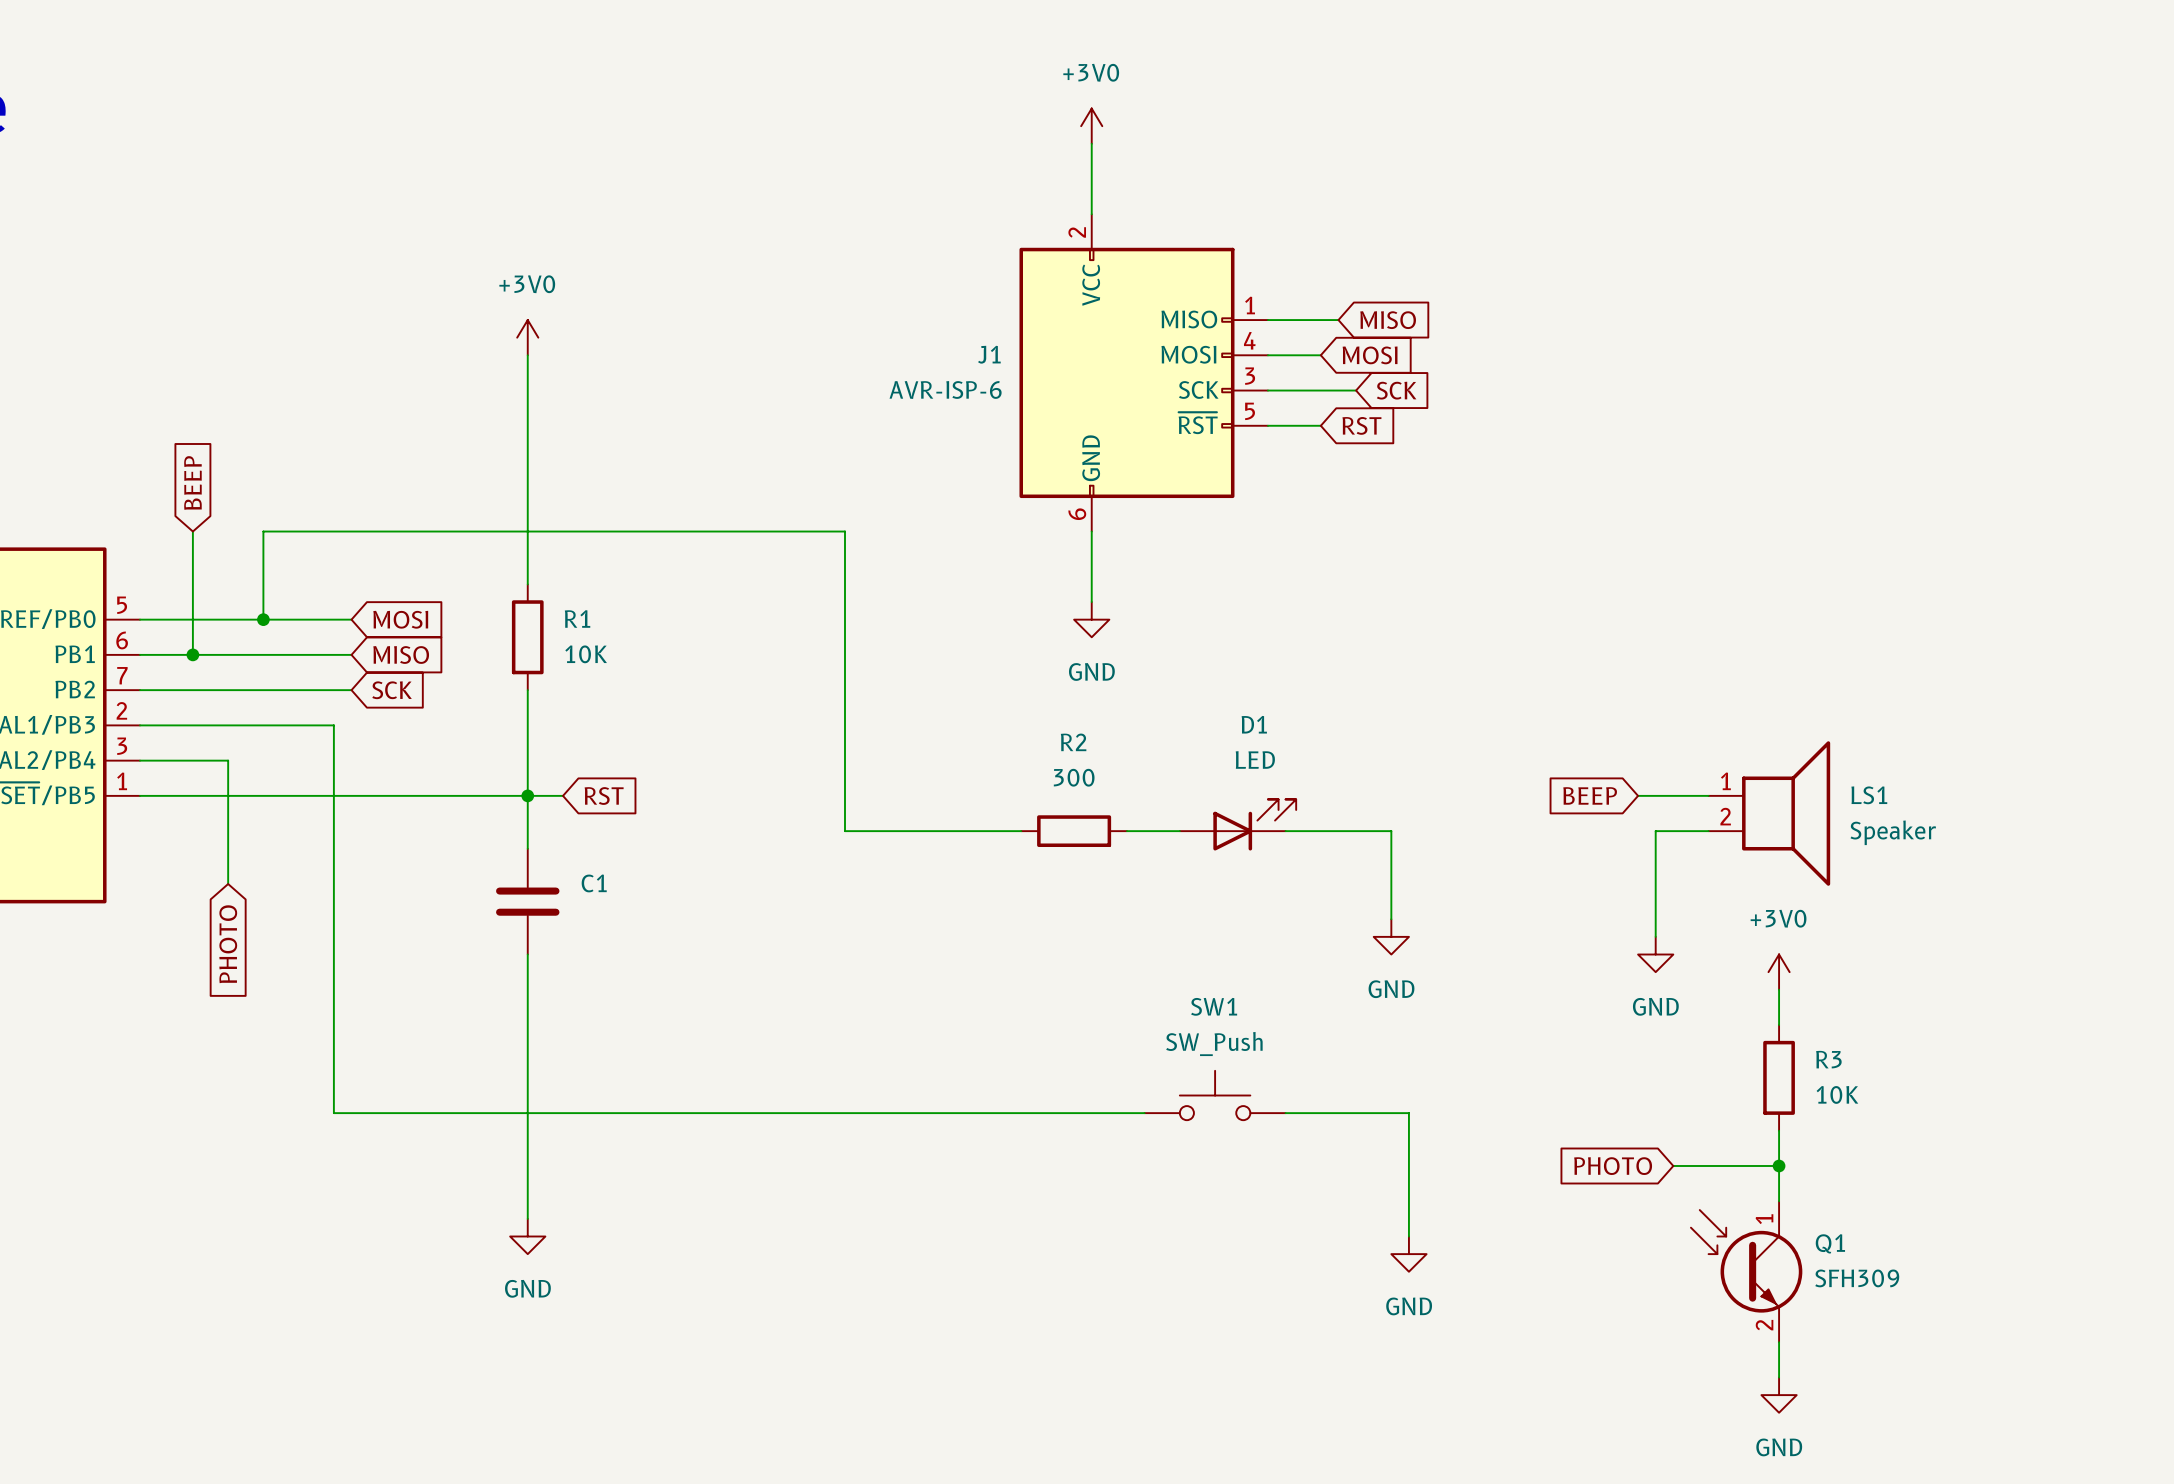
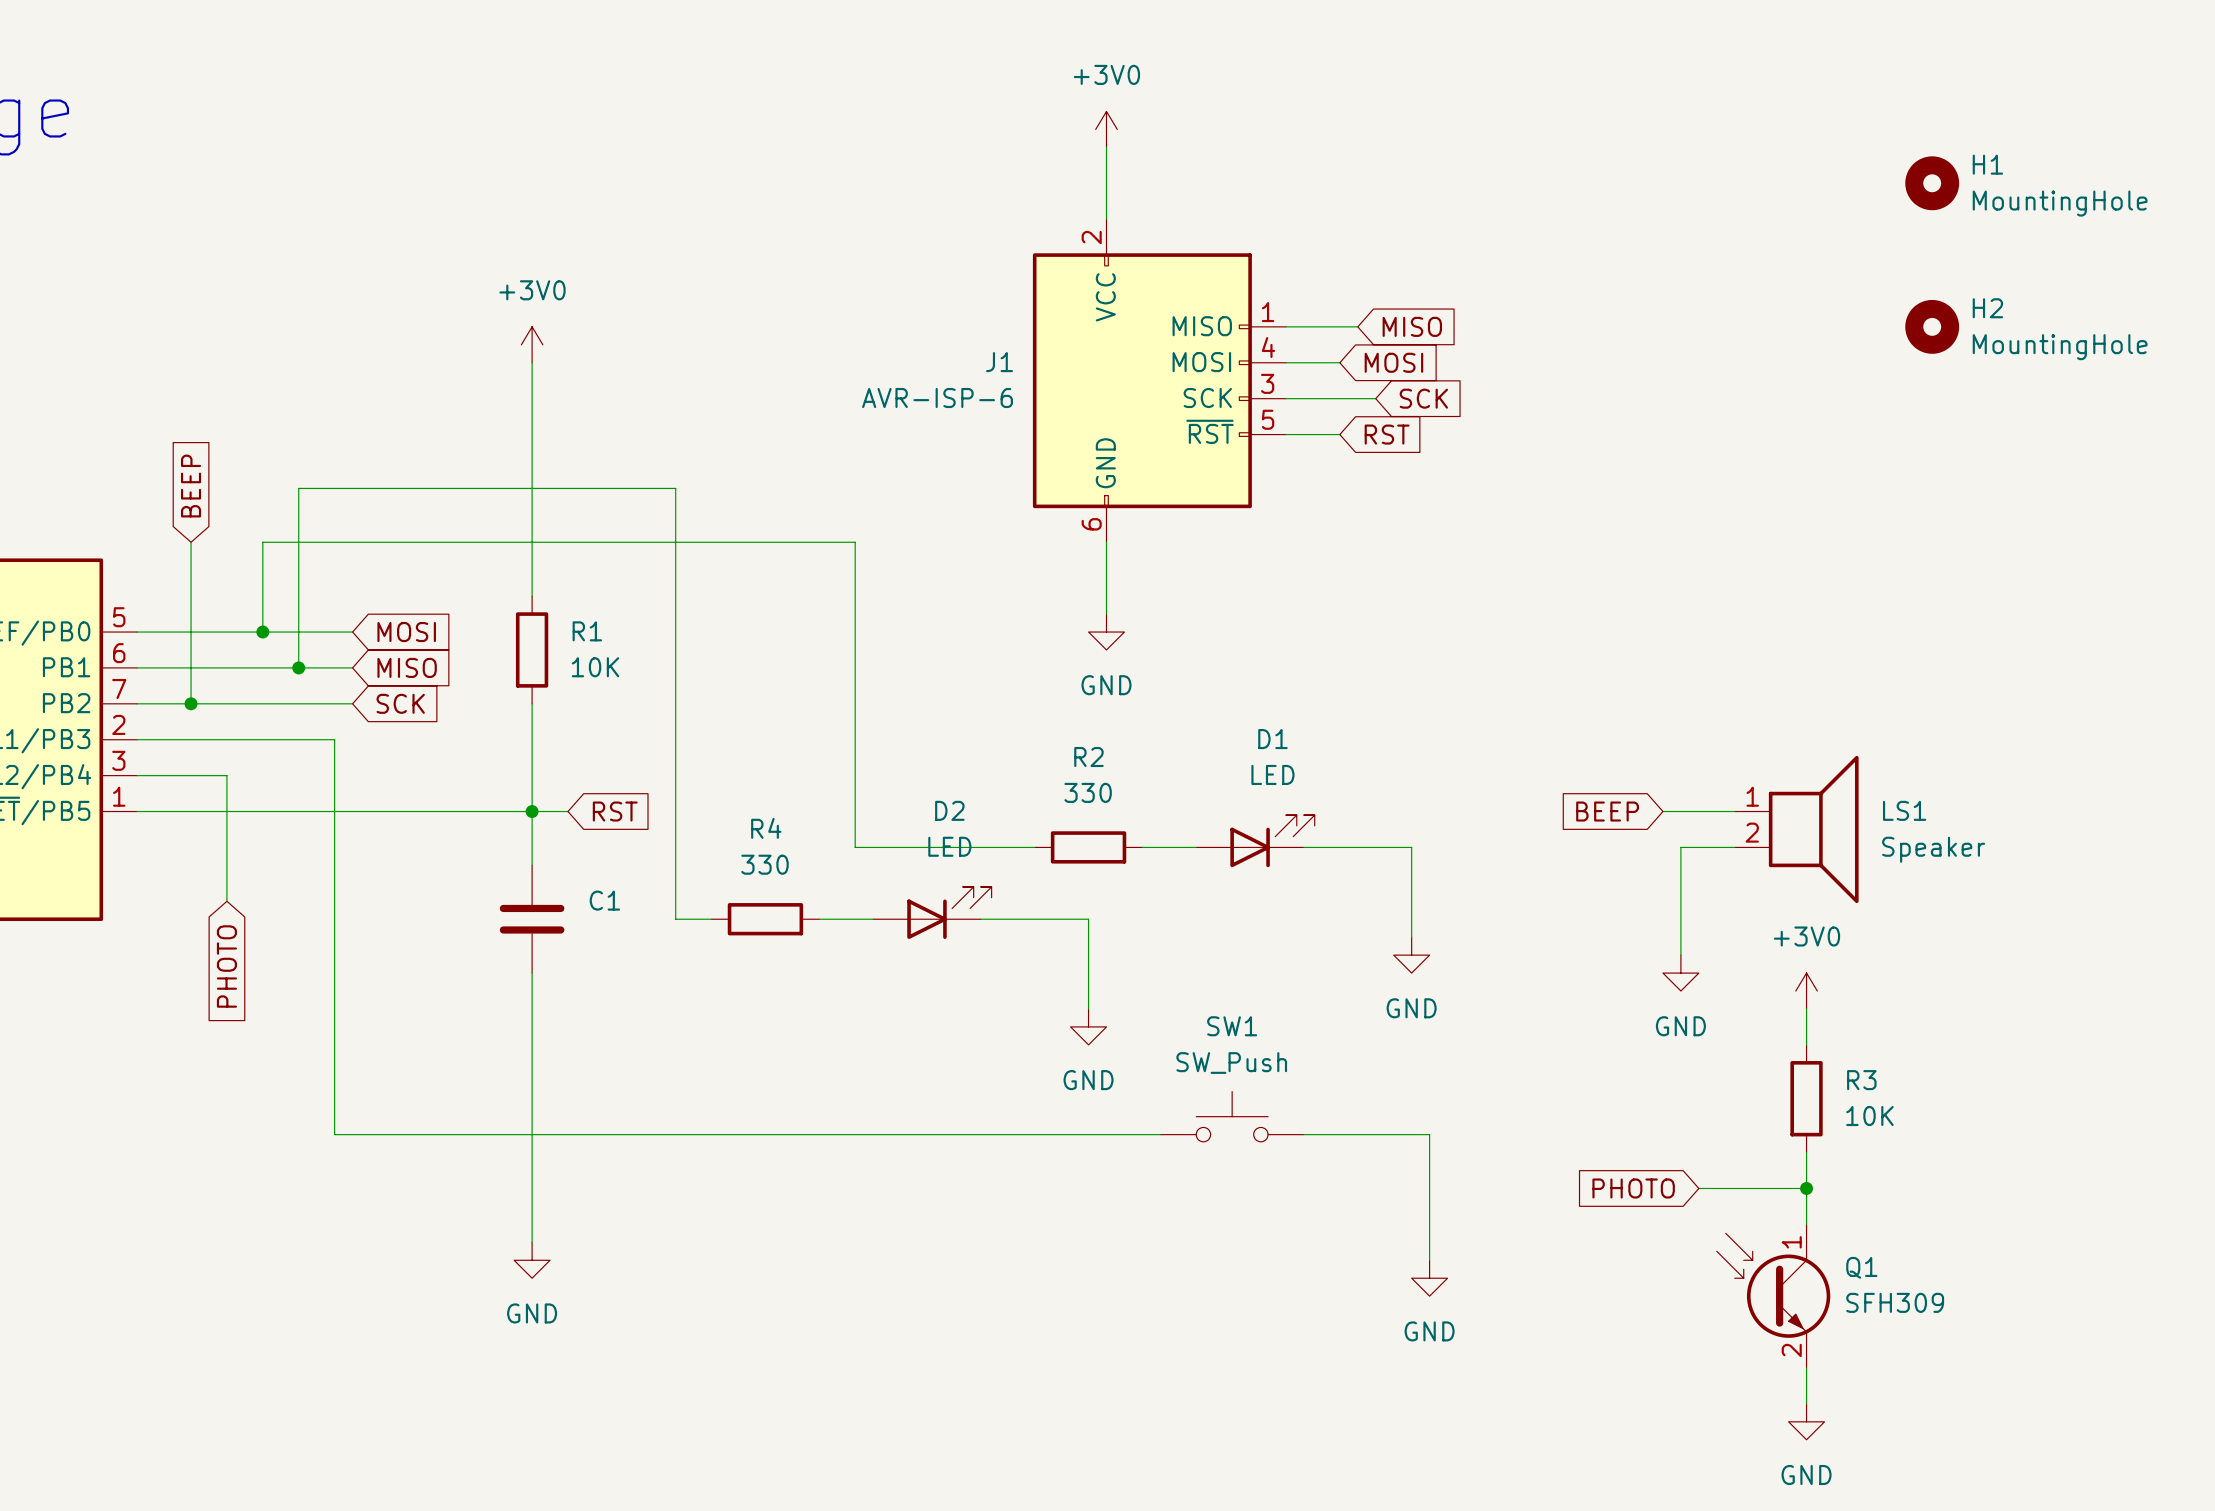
H1: none -> MountingHole (1932, 183)
H2: none -> MountingHole (1932, 326)
wire: none -> (191, 667) (191, 703)
junction position: (192, 654) -> (191, 703)
wire: none -> (298, 667) (298, 488) (675, 488) (675, 919) (711, 919)
junction: none -> (298, 667)
R2 value: 300 (1074, 777) -> 330 (1088, 792)
D2: none -> LED (932, 912)
R4: none -> 330 (765, 919)
wire: none -> (819, 919) (873, 919)
wire: none -> (980, 919) (1088, 919) (1088, 1008)
power symbol: none -> GND (1088, 1026)

